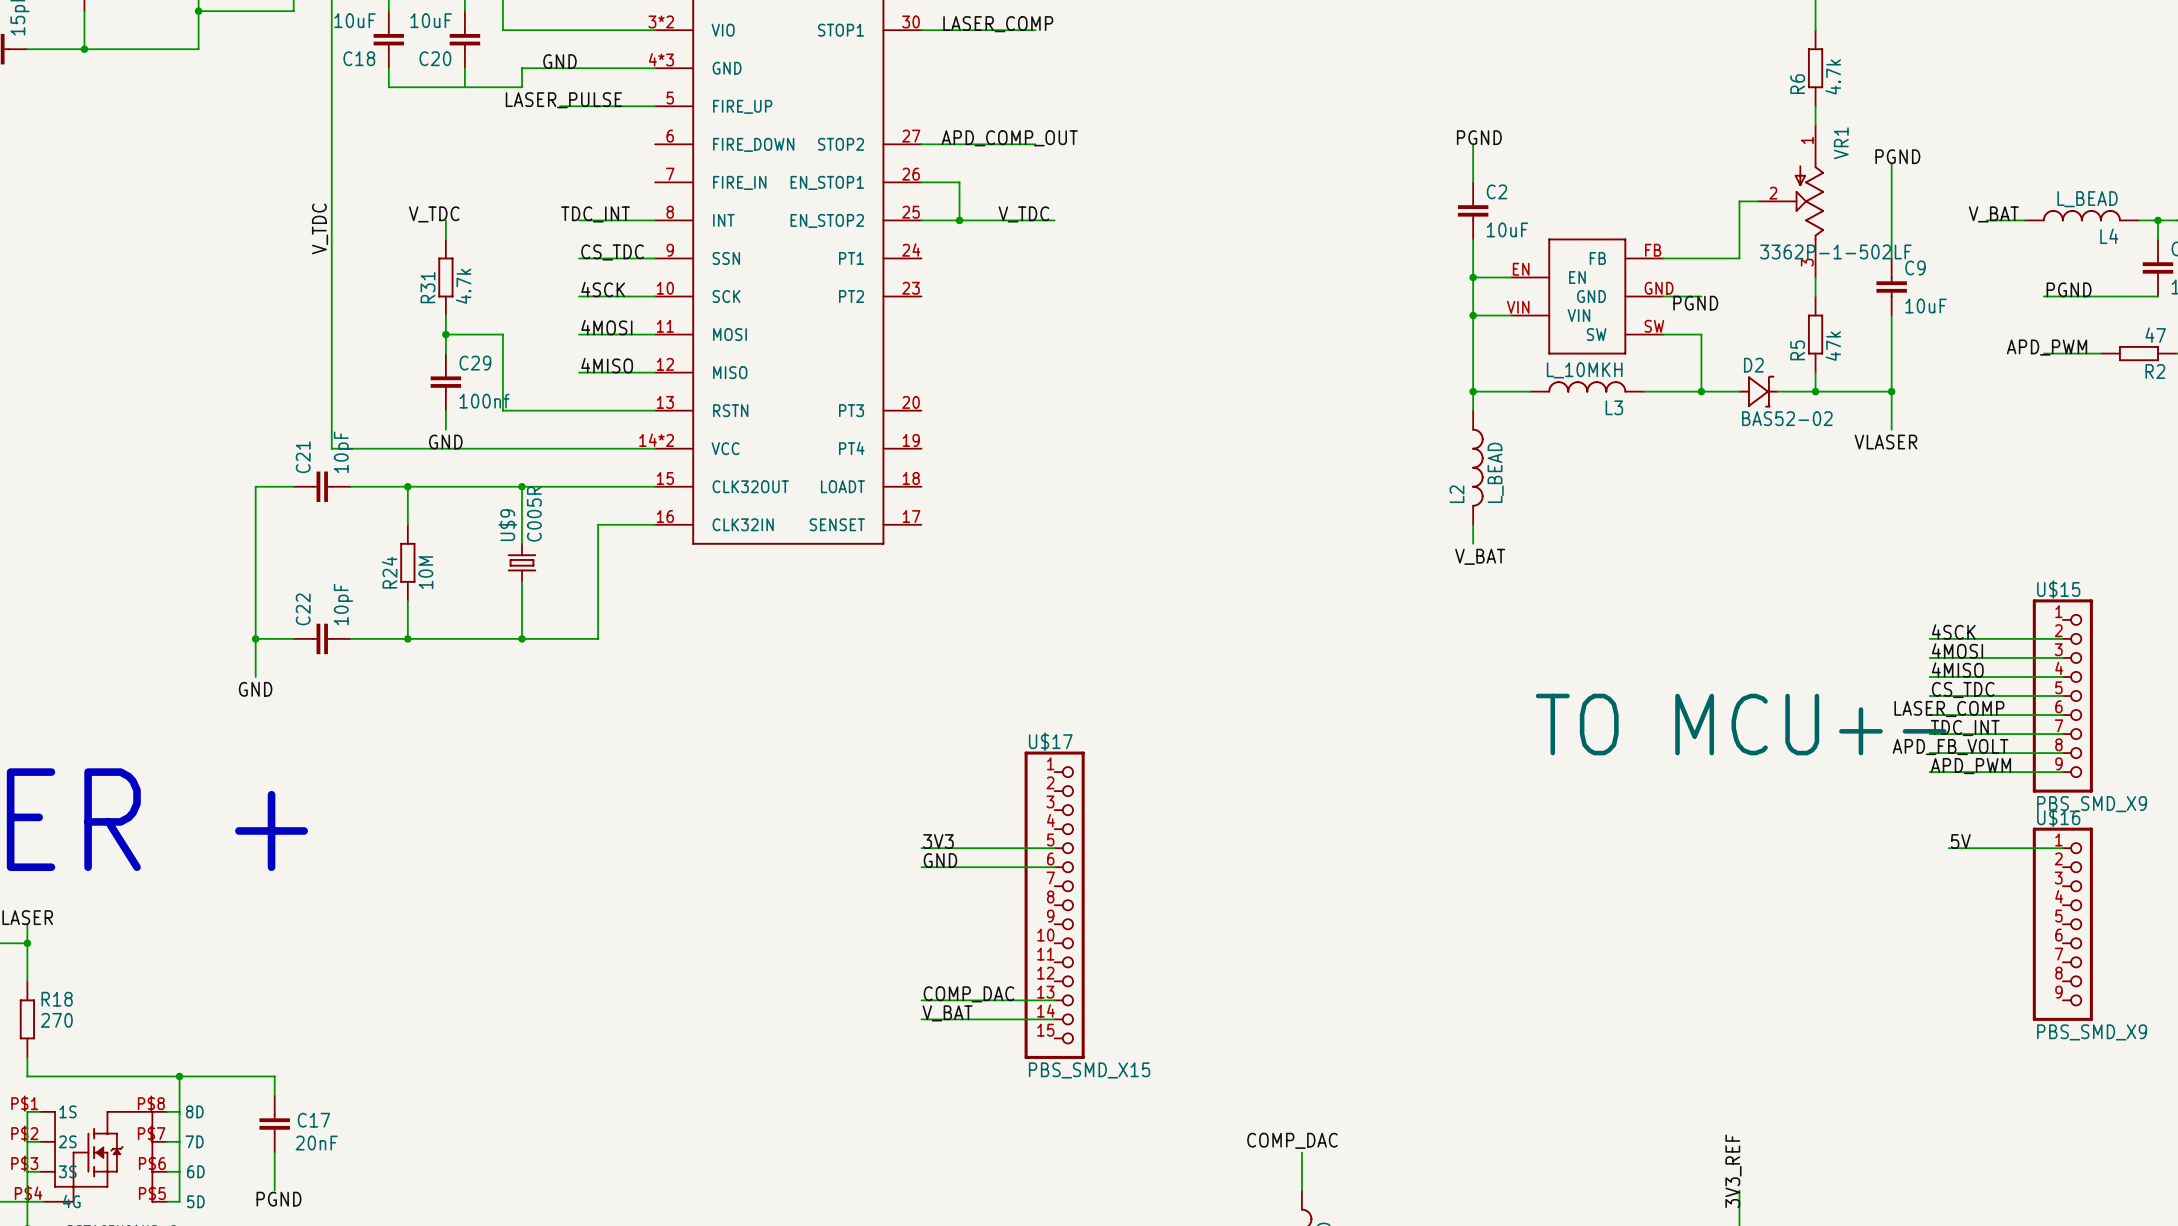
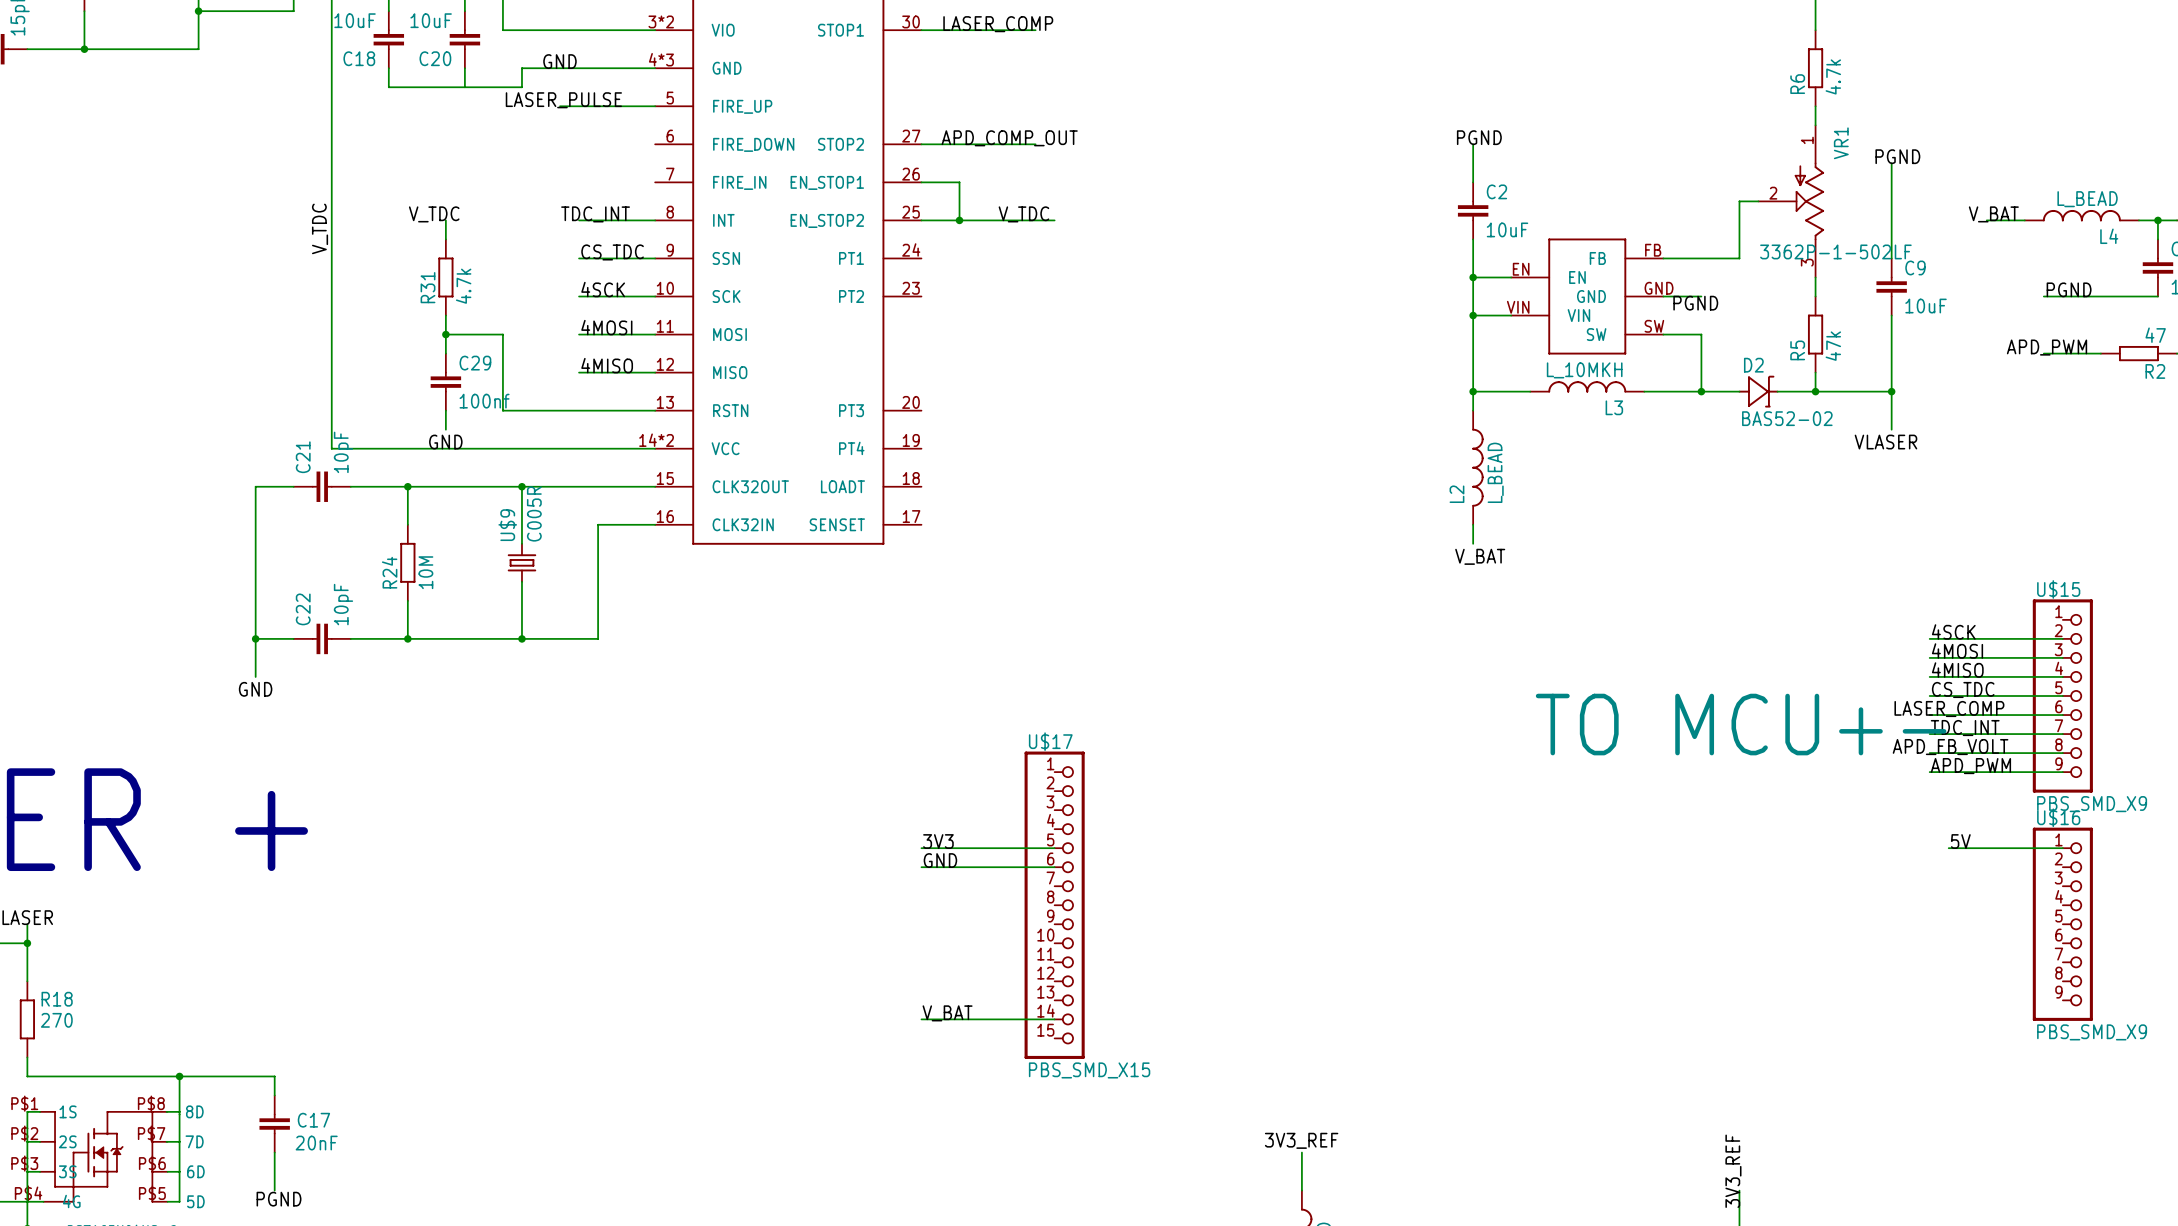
label: COMP_DAC (968, 994) -> none
wire: (921, 1000) (1054, 1000) -> none
label: COMP_DAC (1292, 1140) -> 3V3_REF (1301, 1140)

